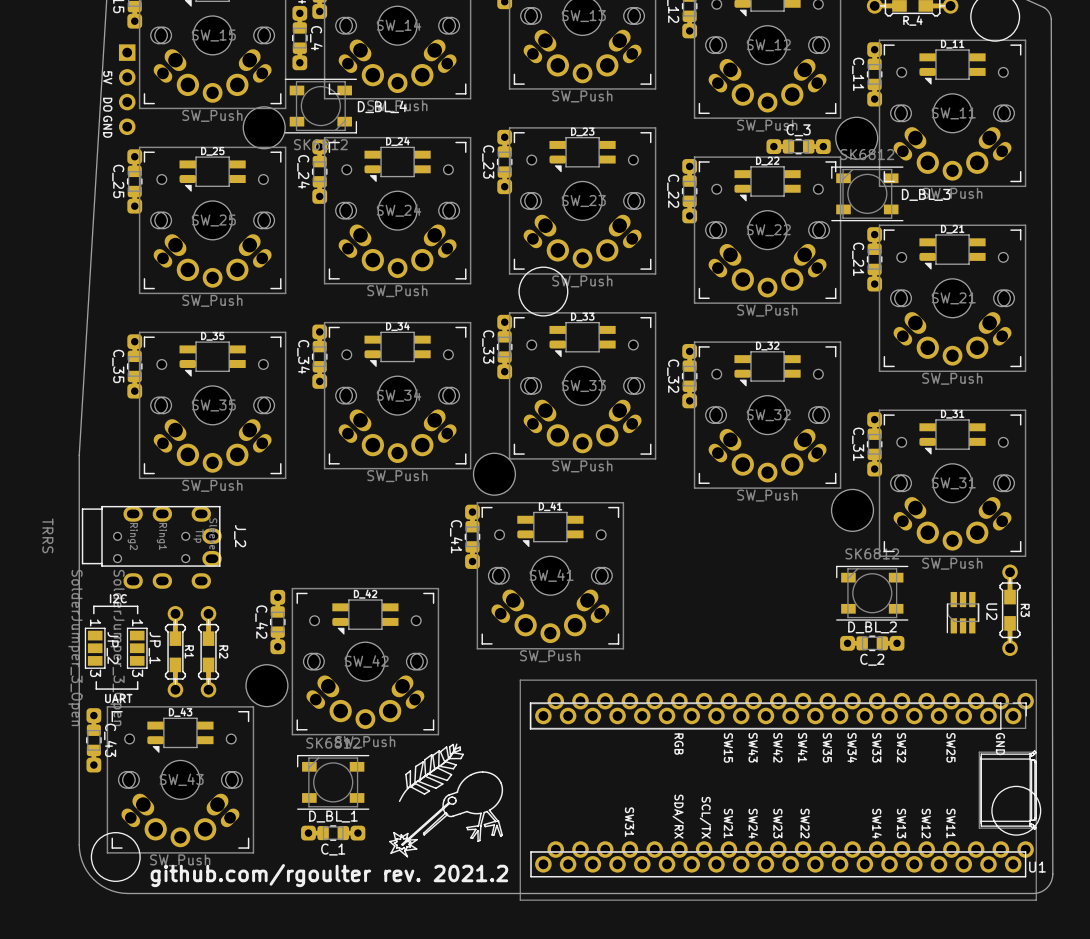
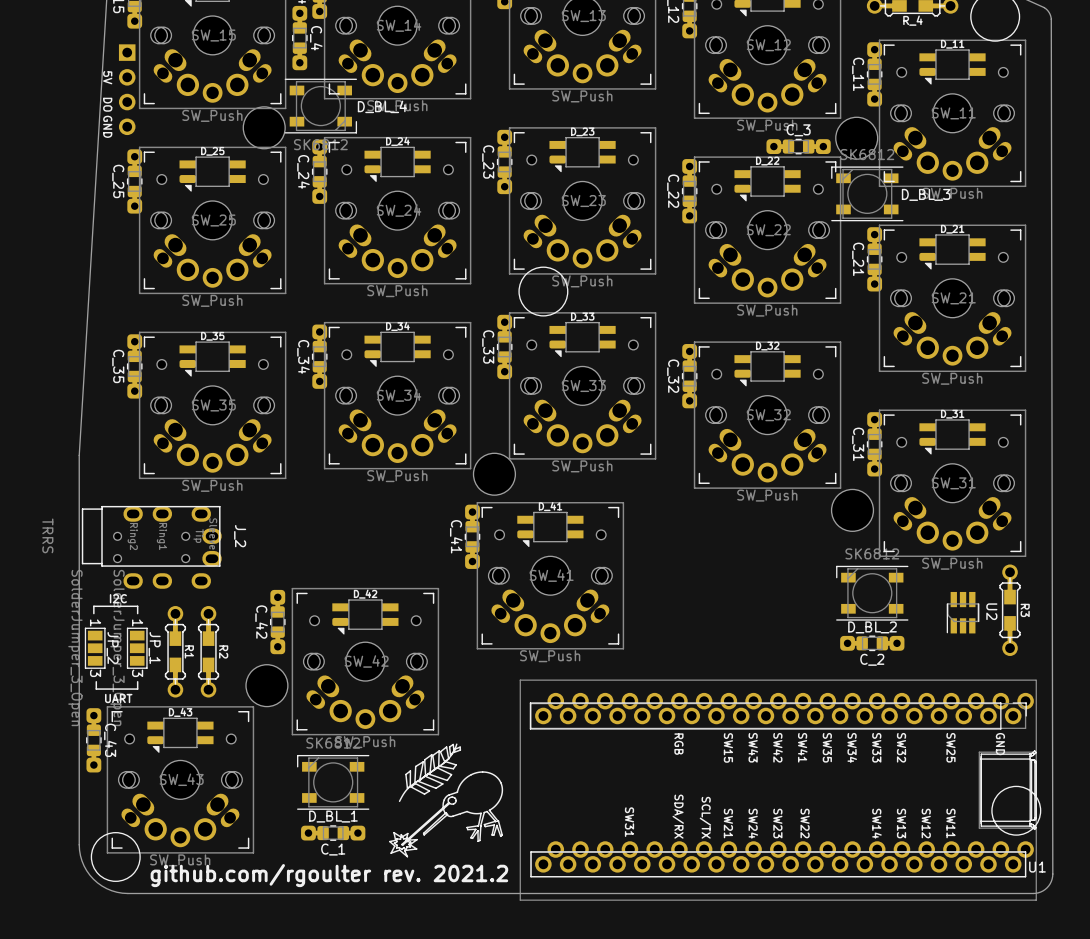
line: (453, 752) (463, 754) (460, 758) (448, 758) (453, 752) -> none

